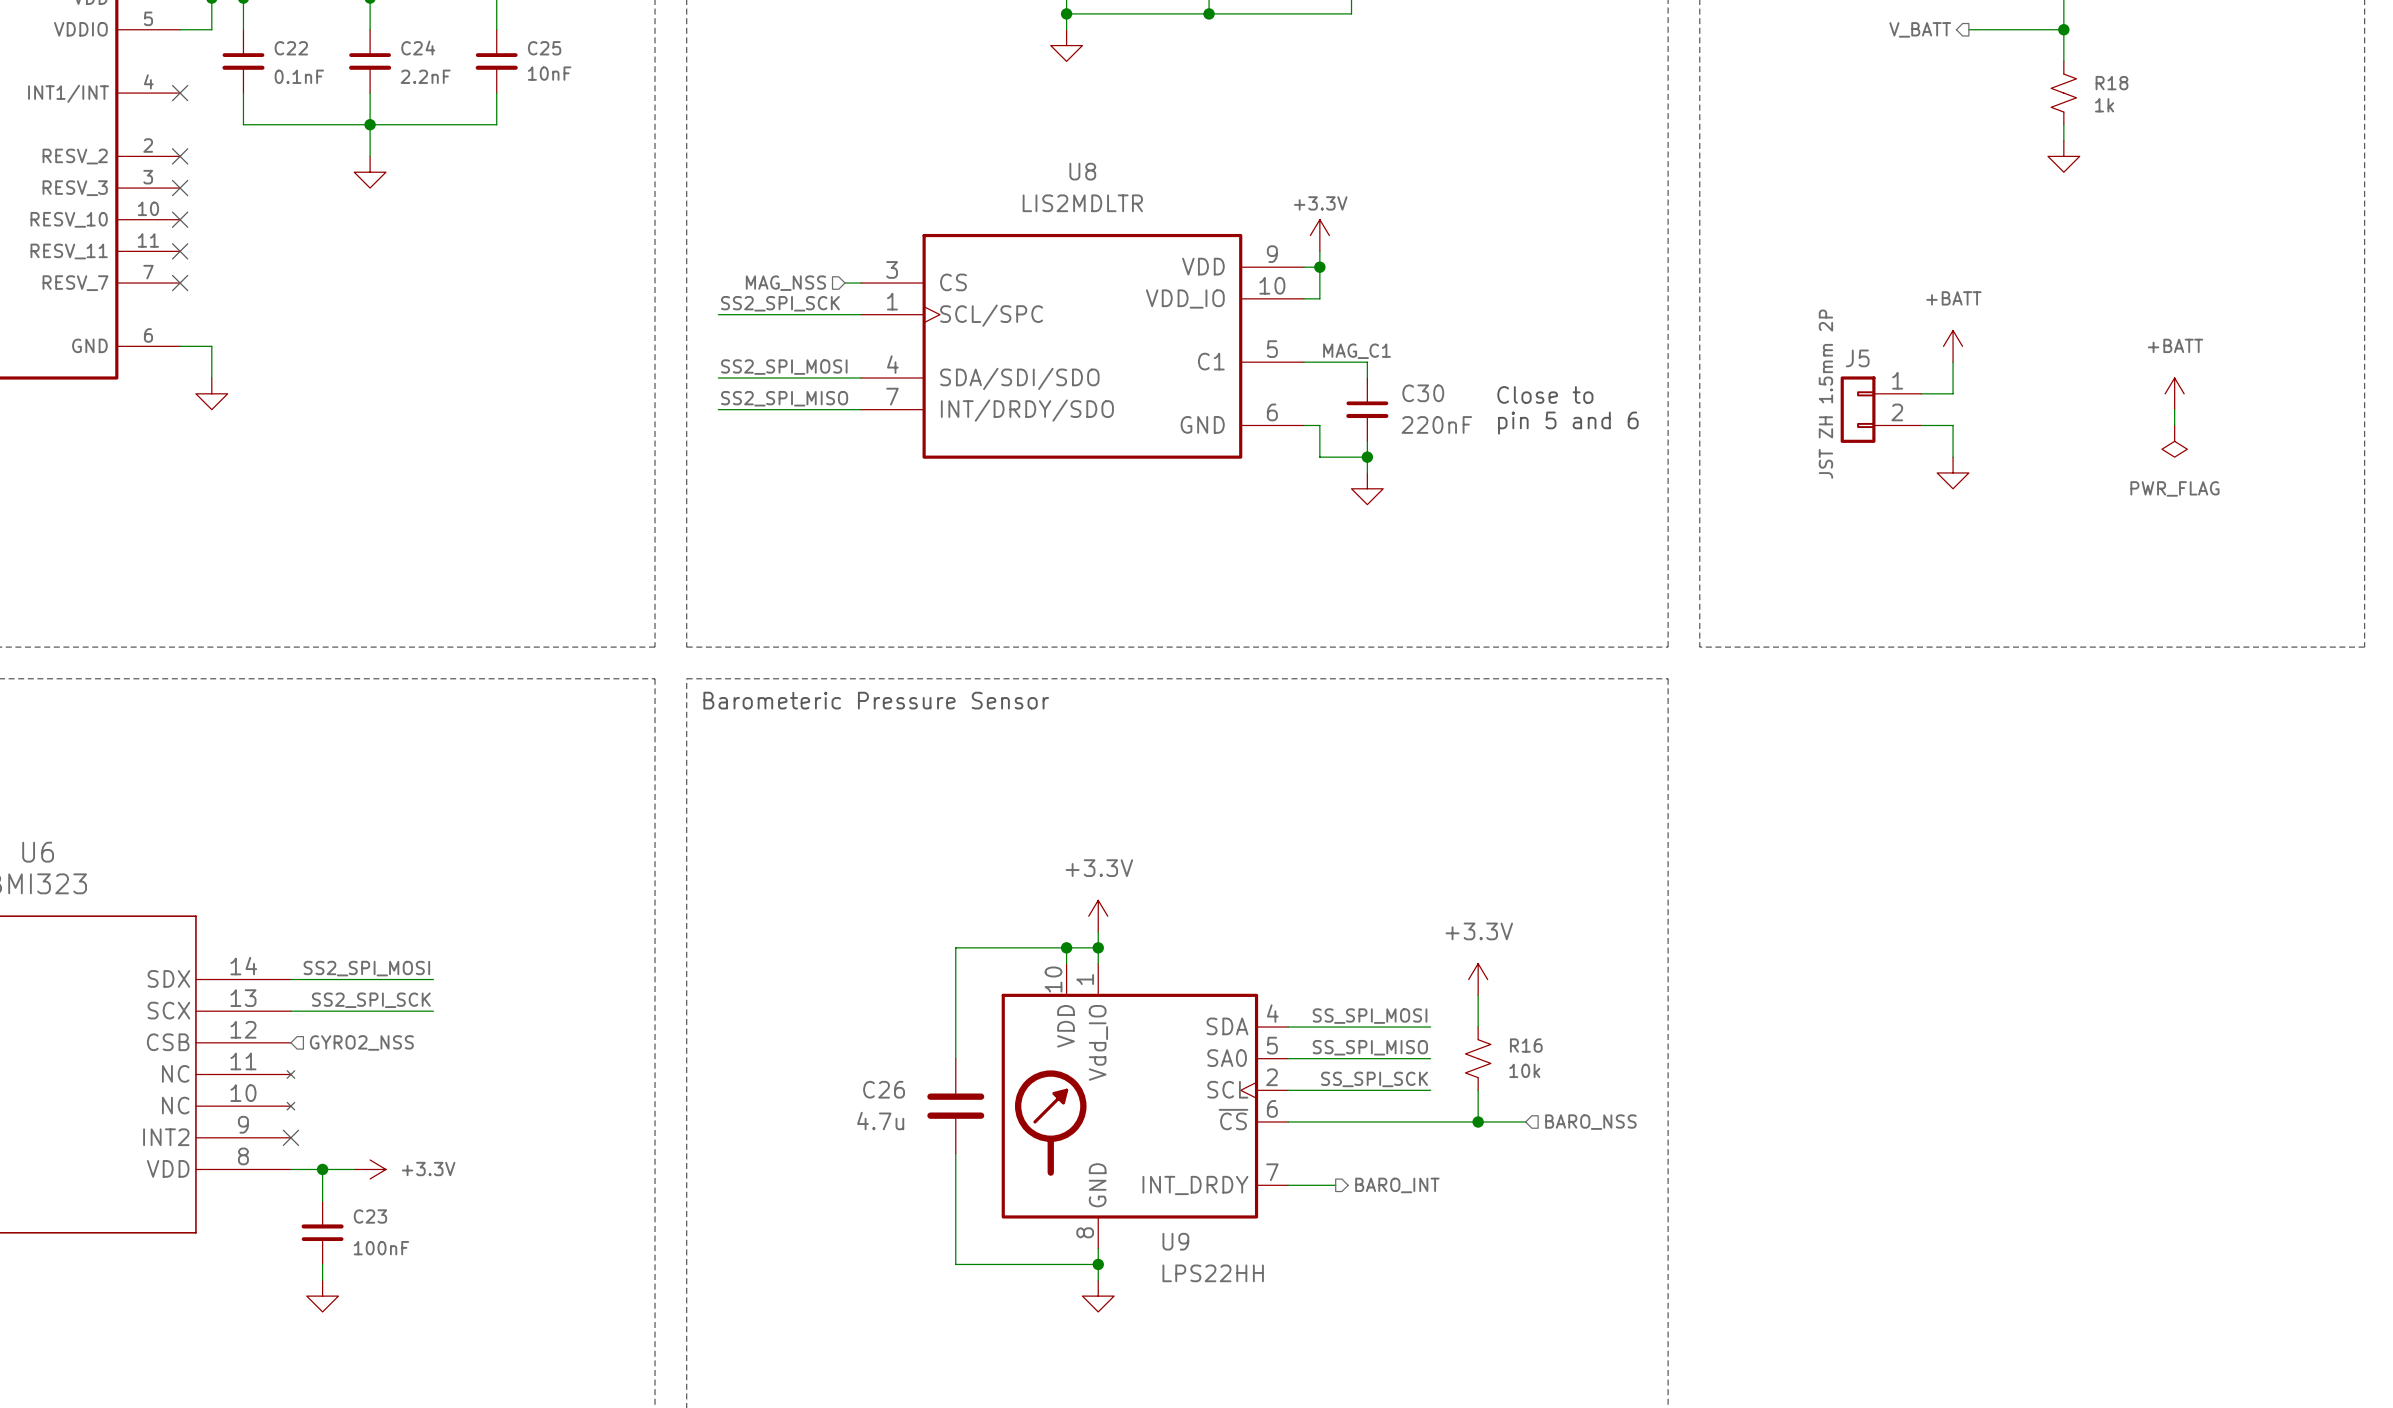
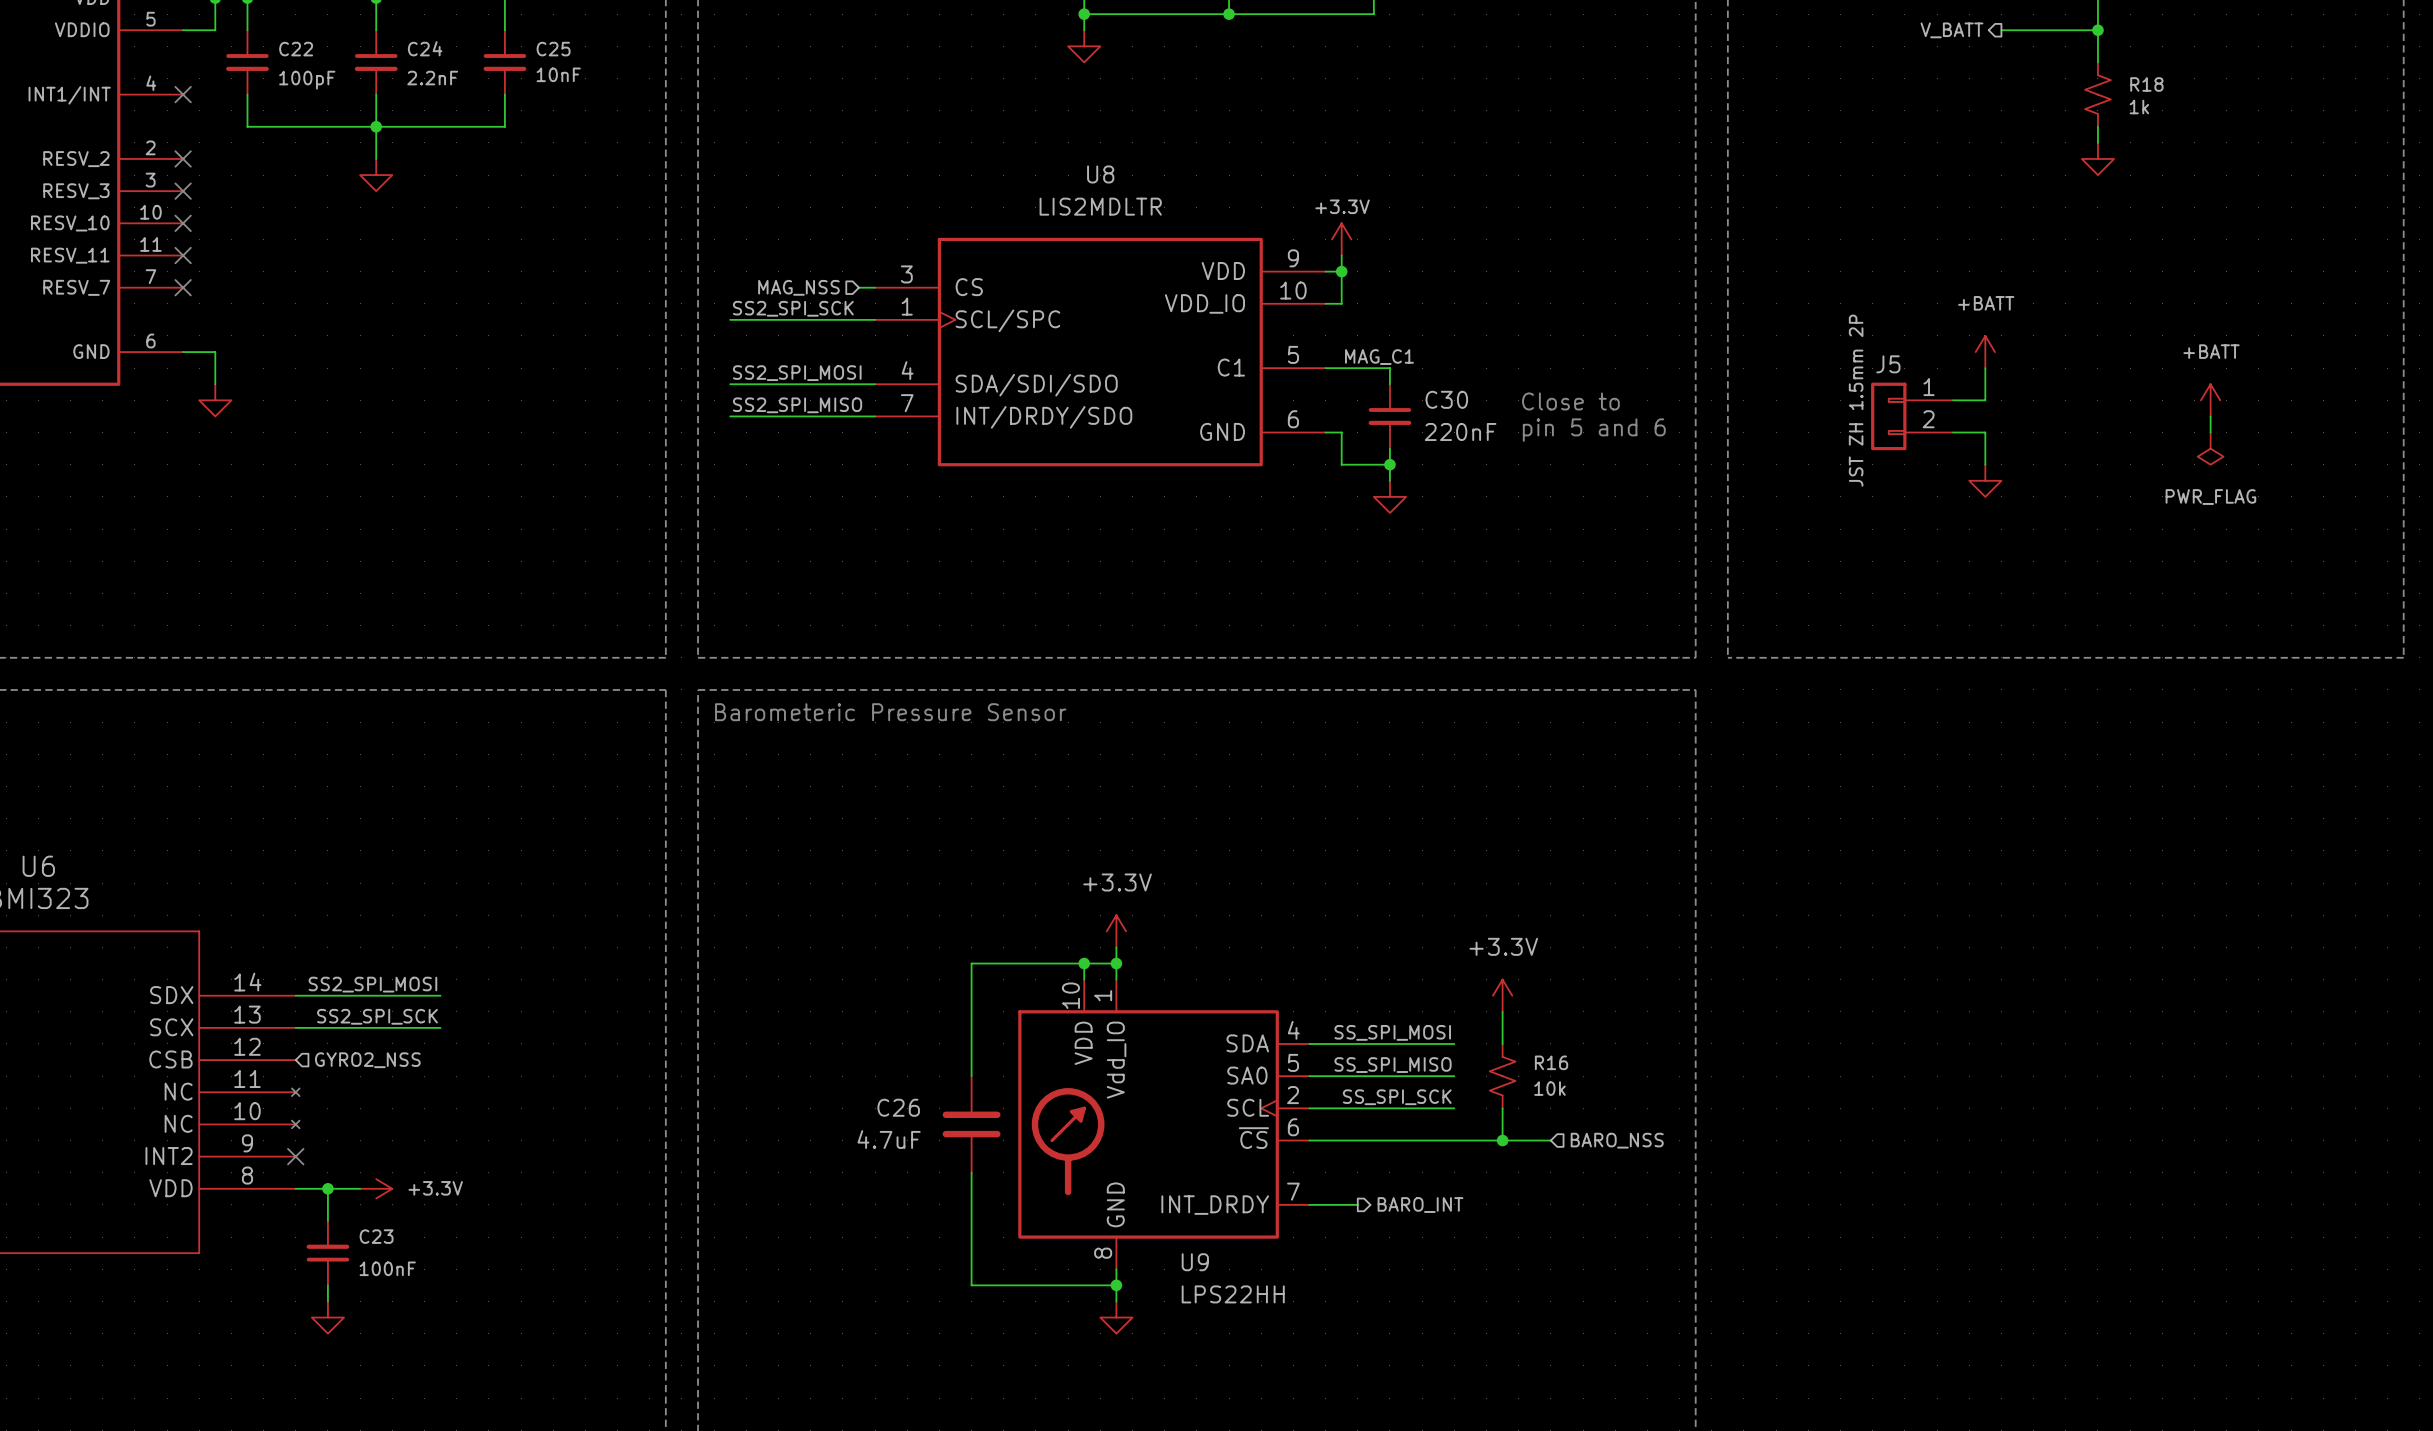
C22 value: 0.1nF (299, 76) -> 100pF (307, 80)
C26 value: 4.7u (880, 1121) -> 4.7uF (889, 1139)

